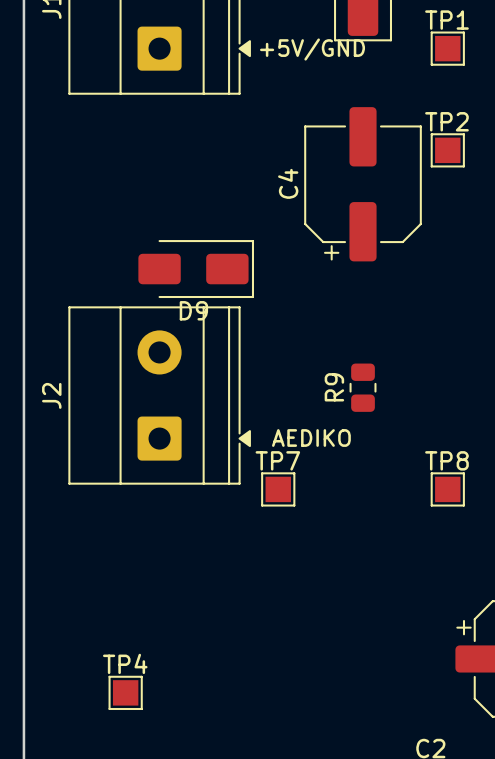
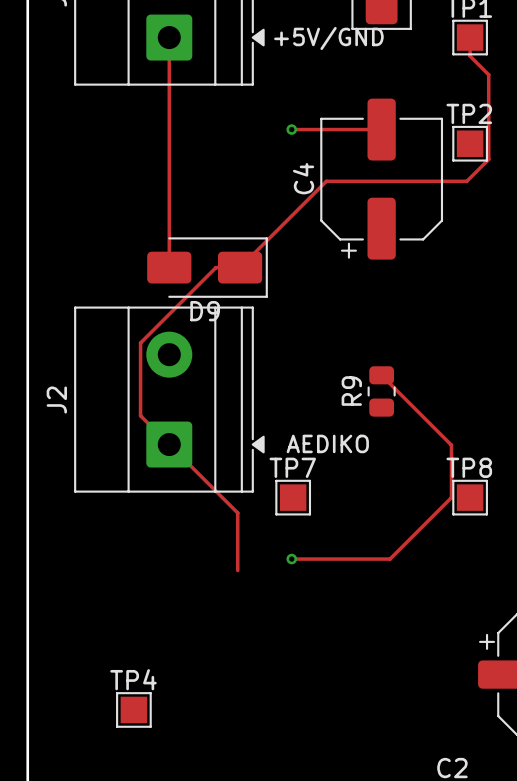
top track: none -> (169, 37) (169, 267)
top track: none -> (470, 37) (470, 56) (488, 74) (488, 159) (466, 181) (326, 181) (240, 267) (215, 267) (140, 342) (140, 415) (237, 512) (237, 570)
top track: none -> (291, 129) (381, 129)
via: none -> (291, 129)
top track: none -> (381, 375) (451, 445) (451, 497) (390, 559) (291, 559)
via: none -> (291, 559)

